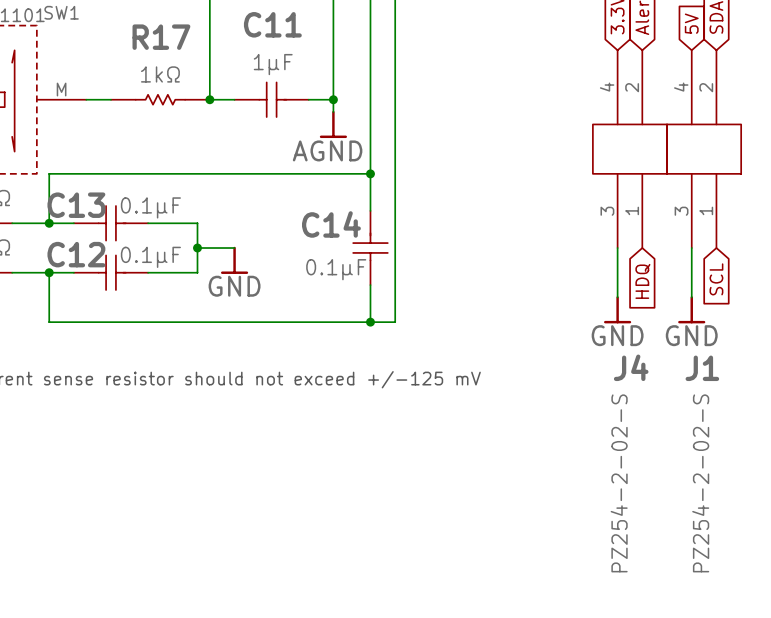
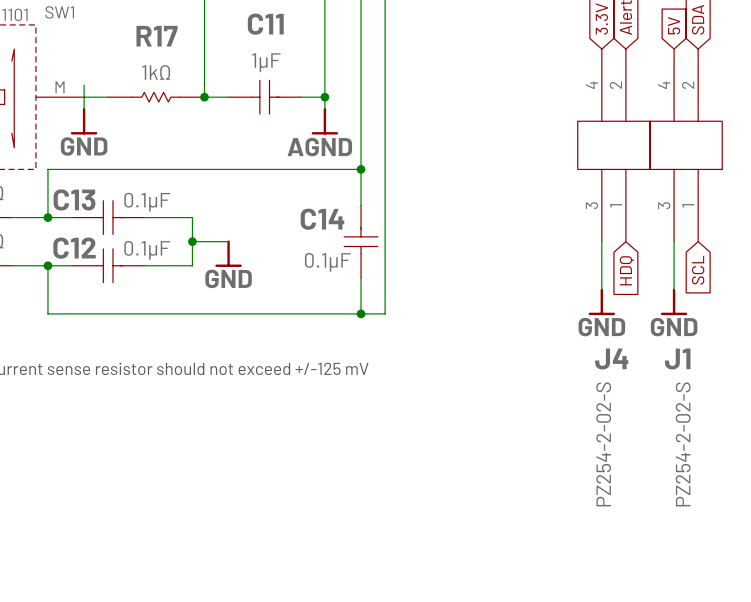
wire: none -> (84, 85) (84, 109)
power symbol: none -> GND (84, 121)

